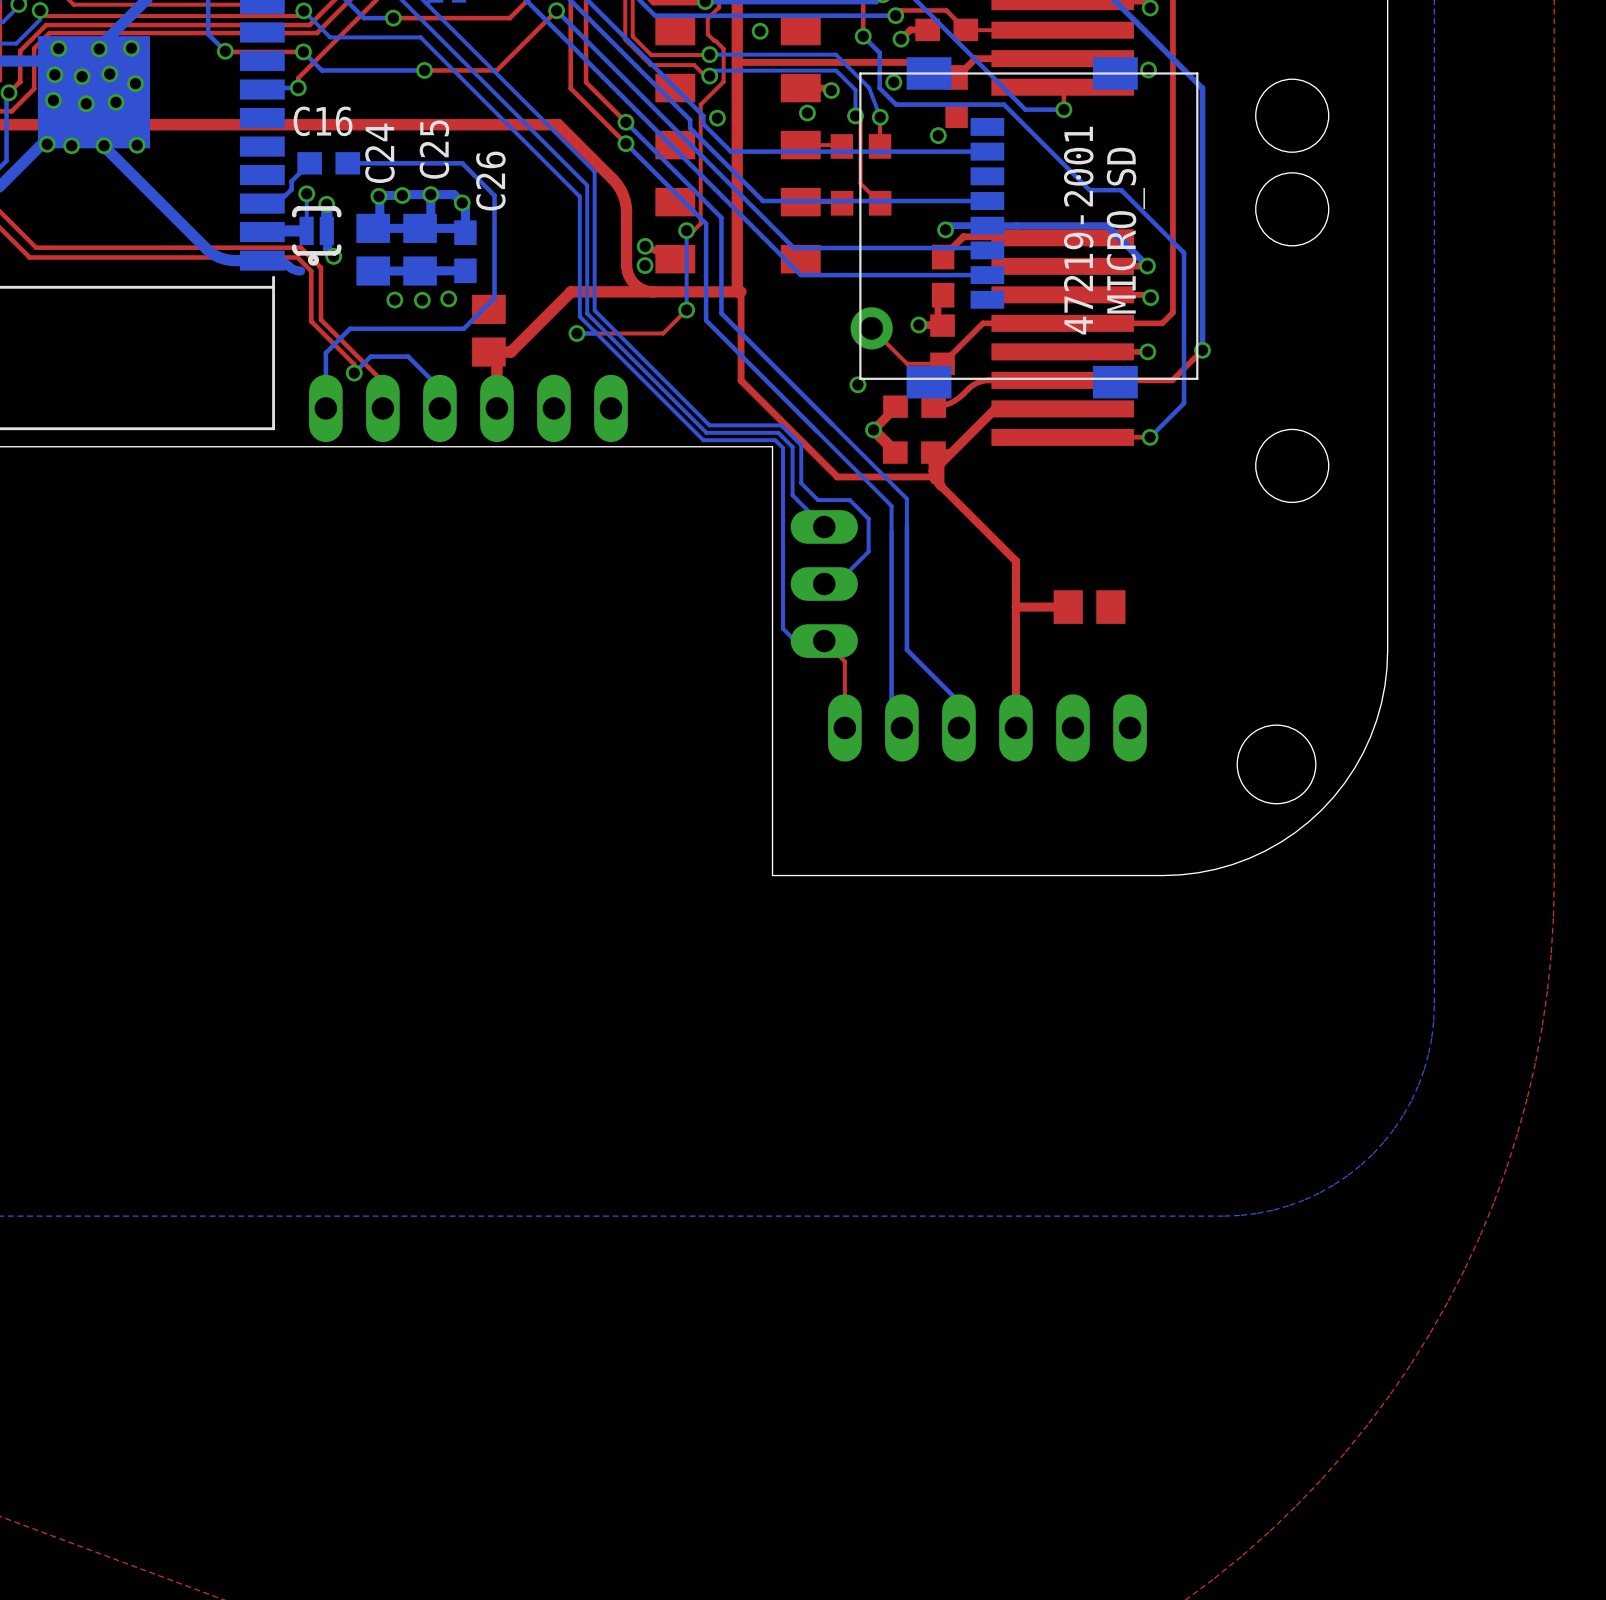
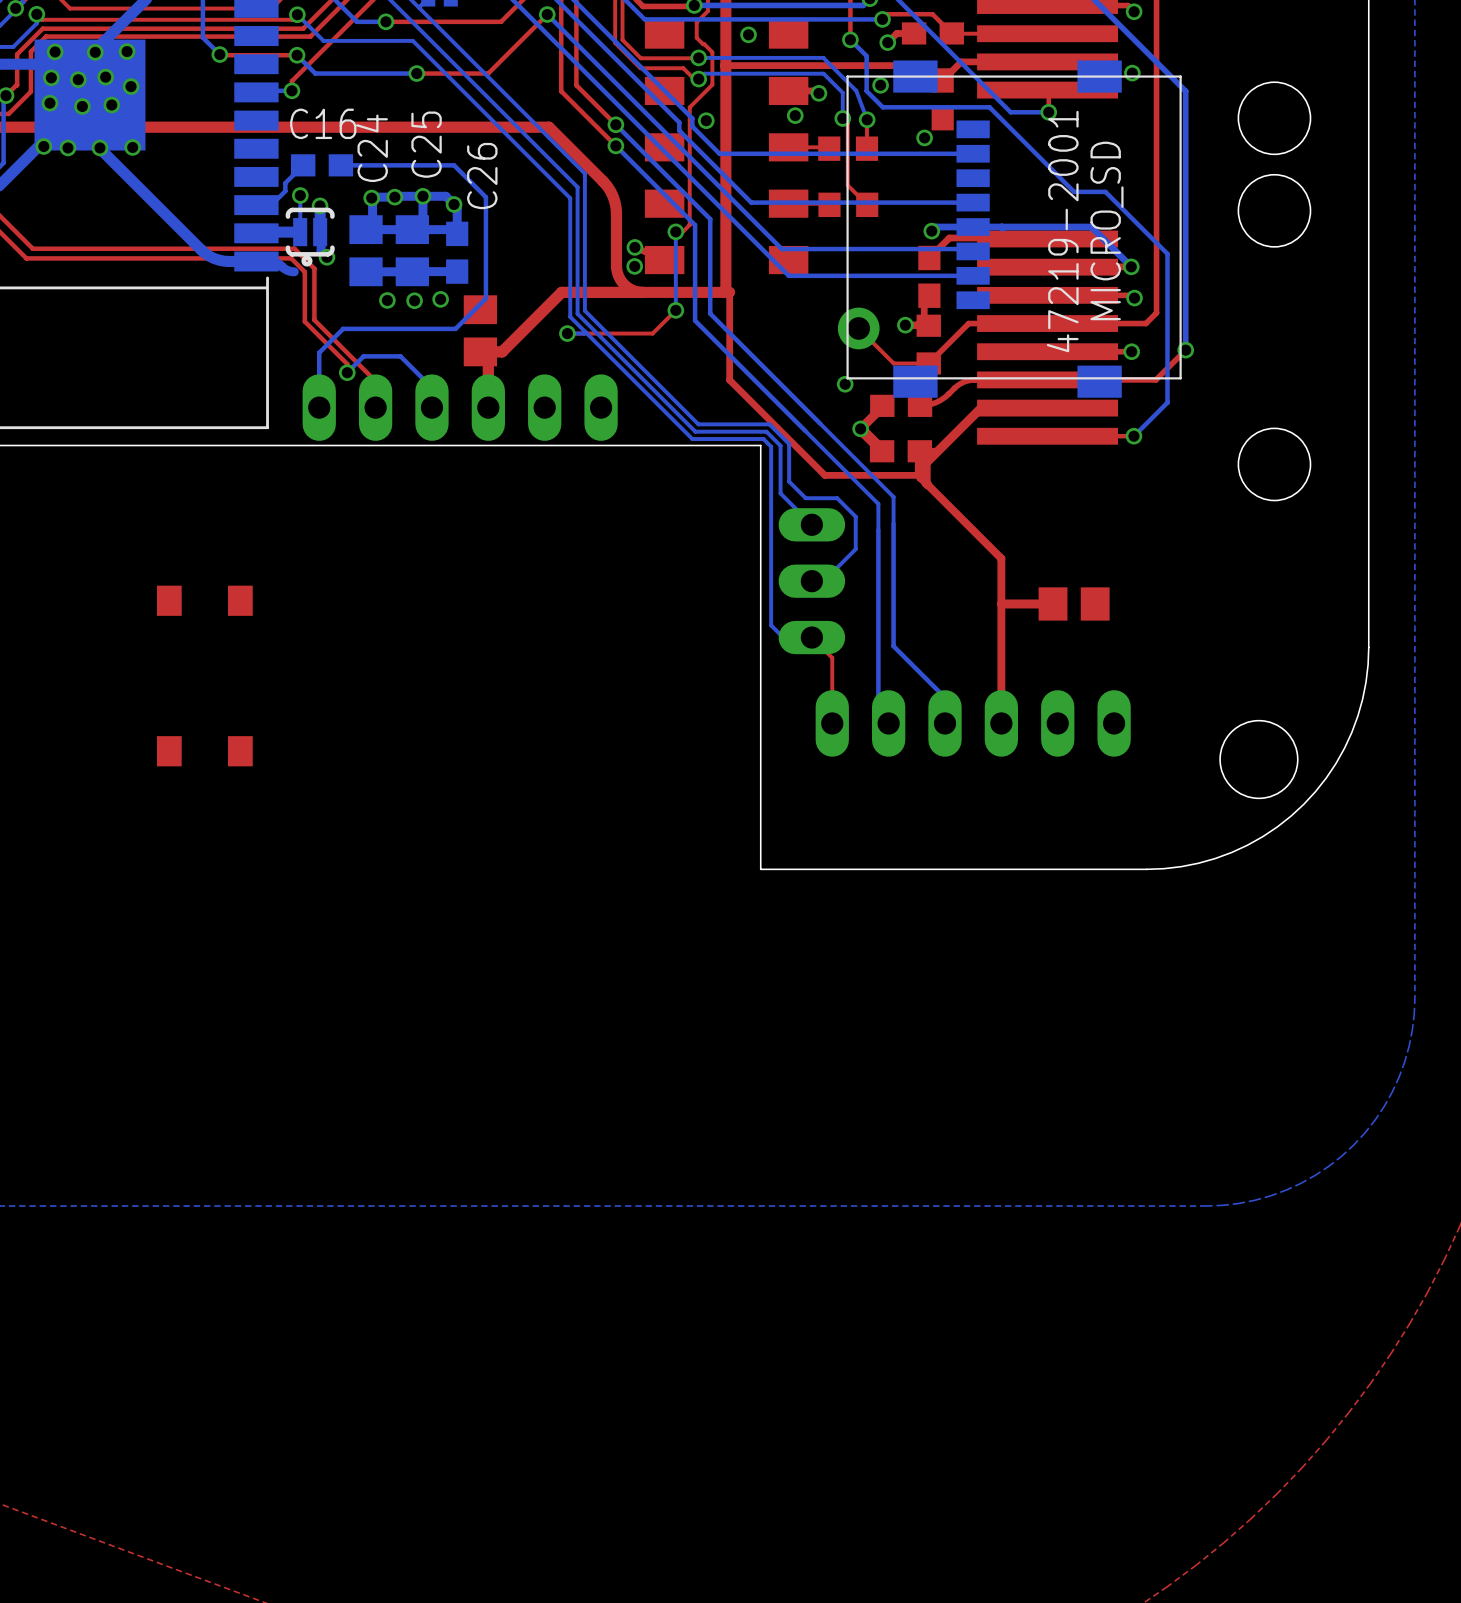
part: none -> (204, 600)
part: none -> (204, 751)

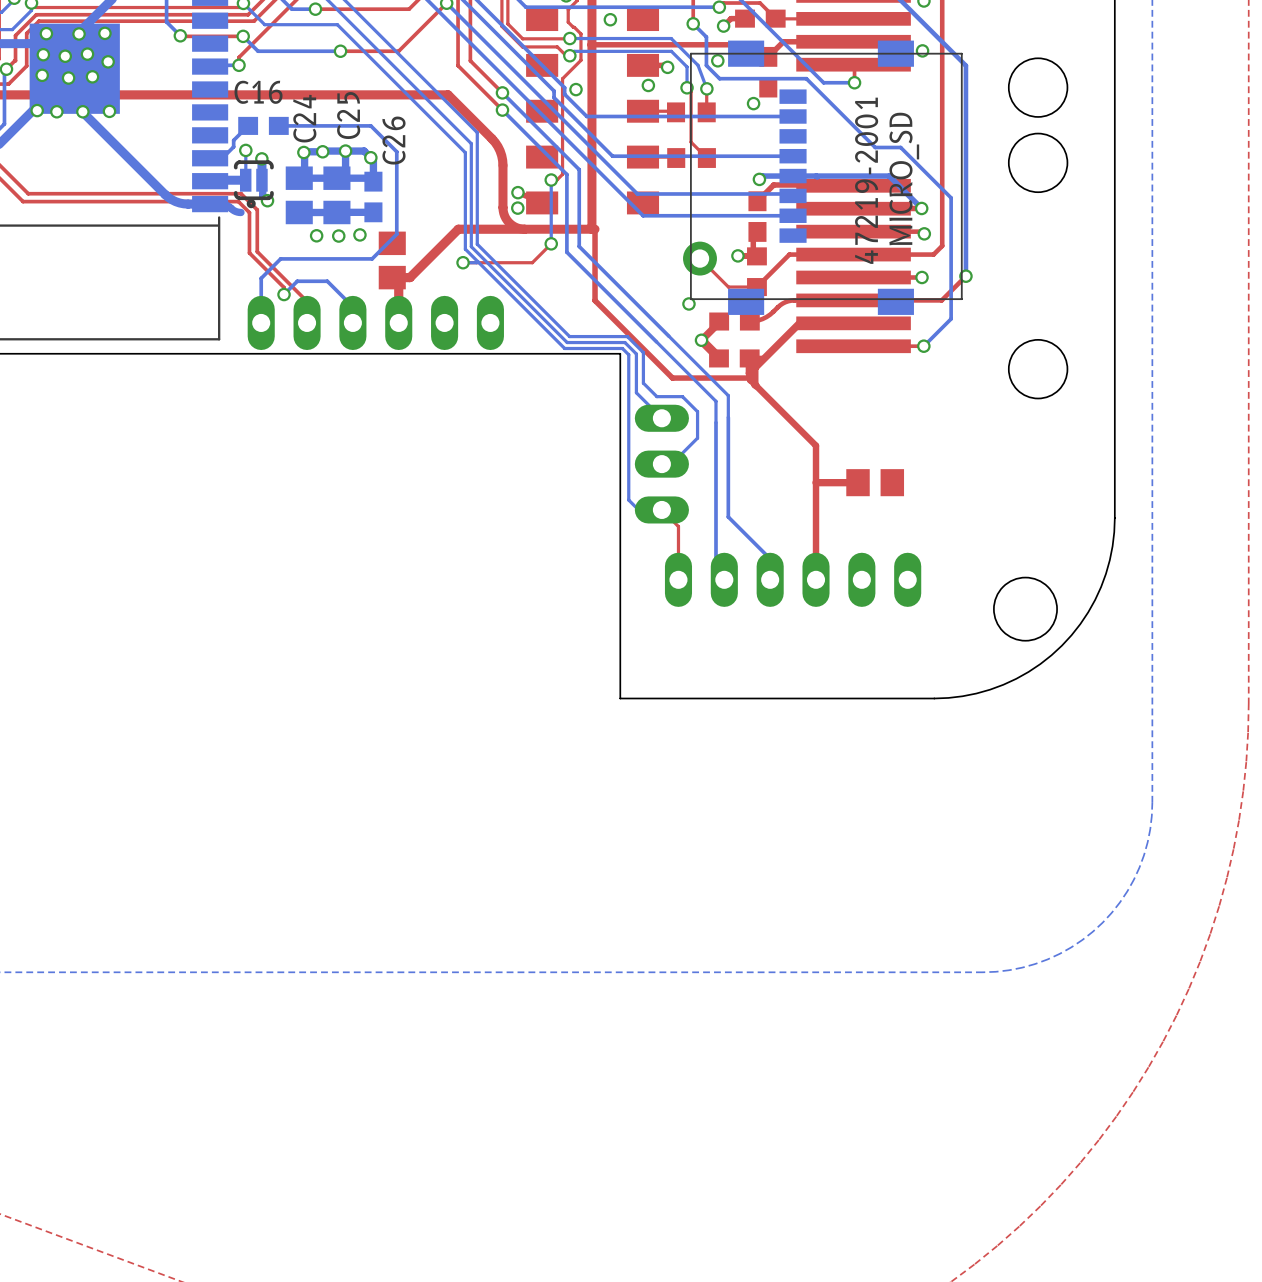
part: (204, 600) -> none
part: (204, 751) -> none

